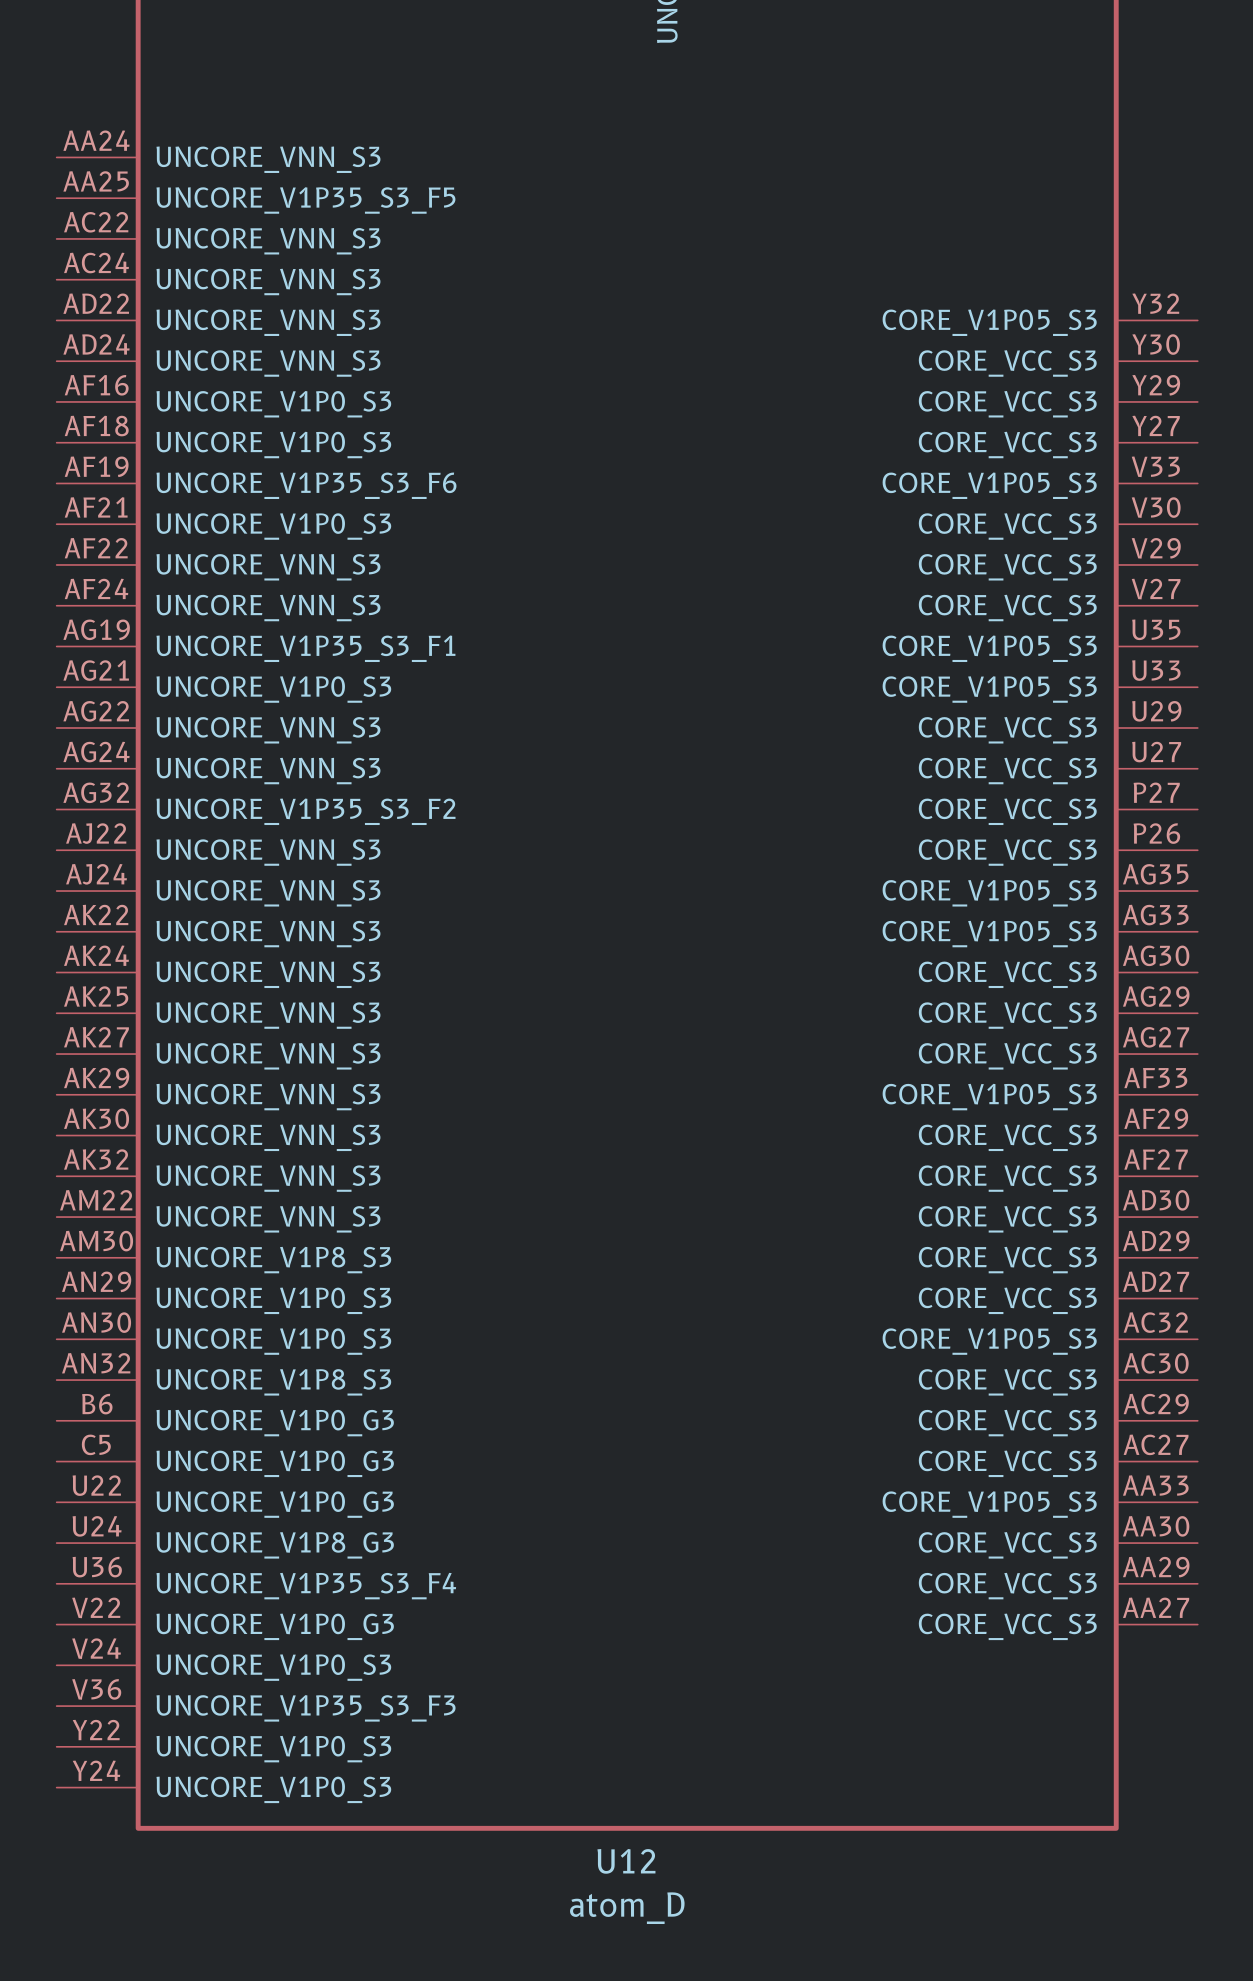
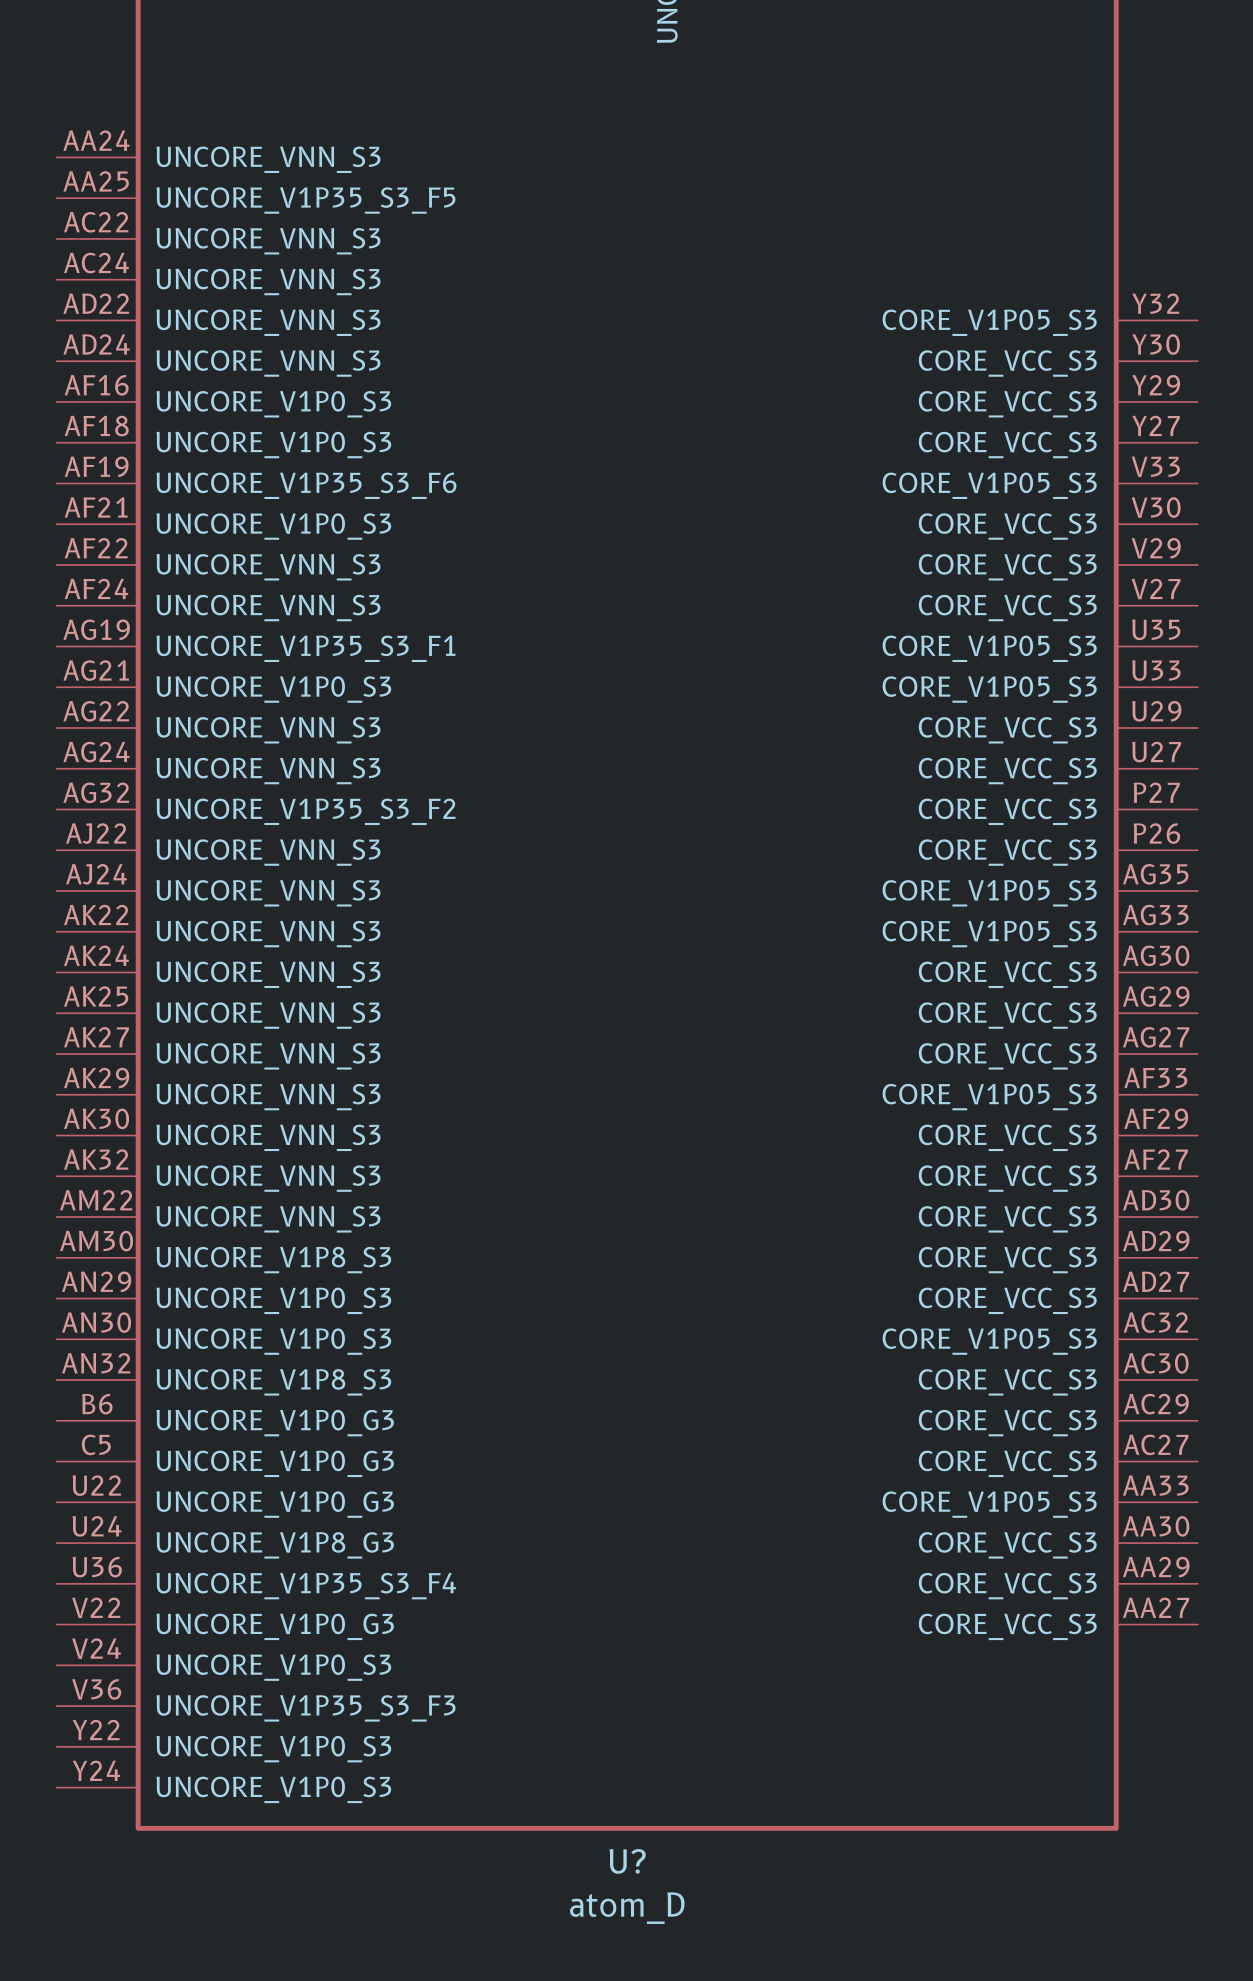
U12 name: U12 (626, 1861) -> U? (627, 1861)

